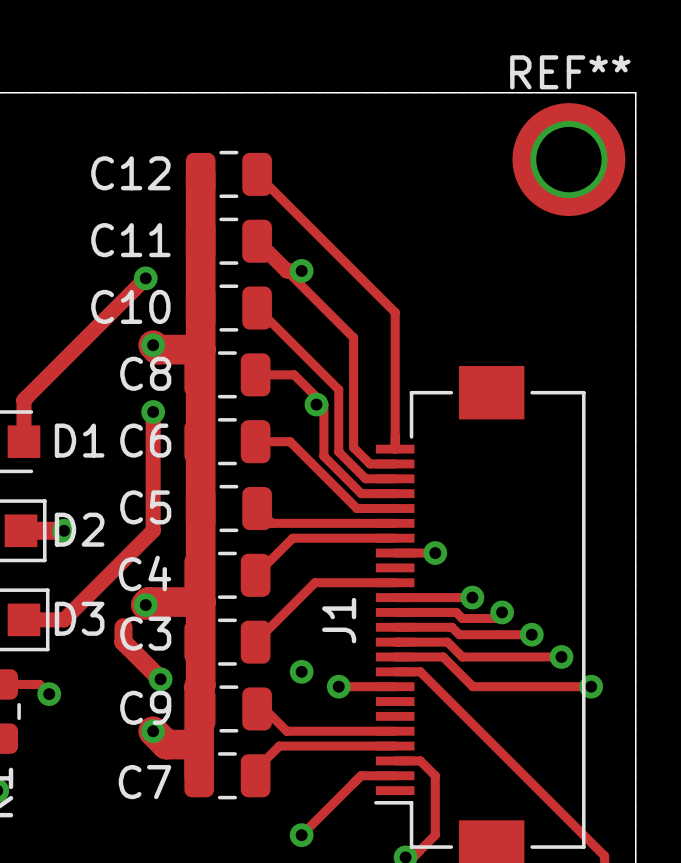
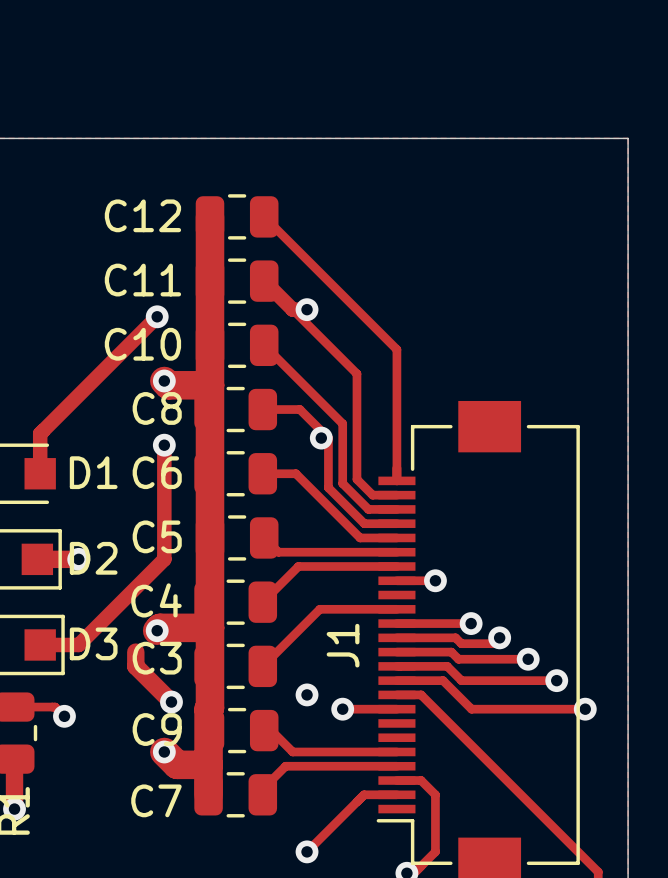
REF**: (568, 159) -> none

